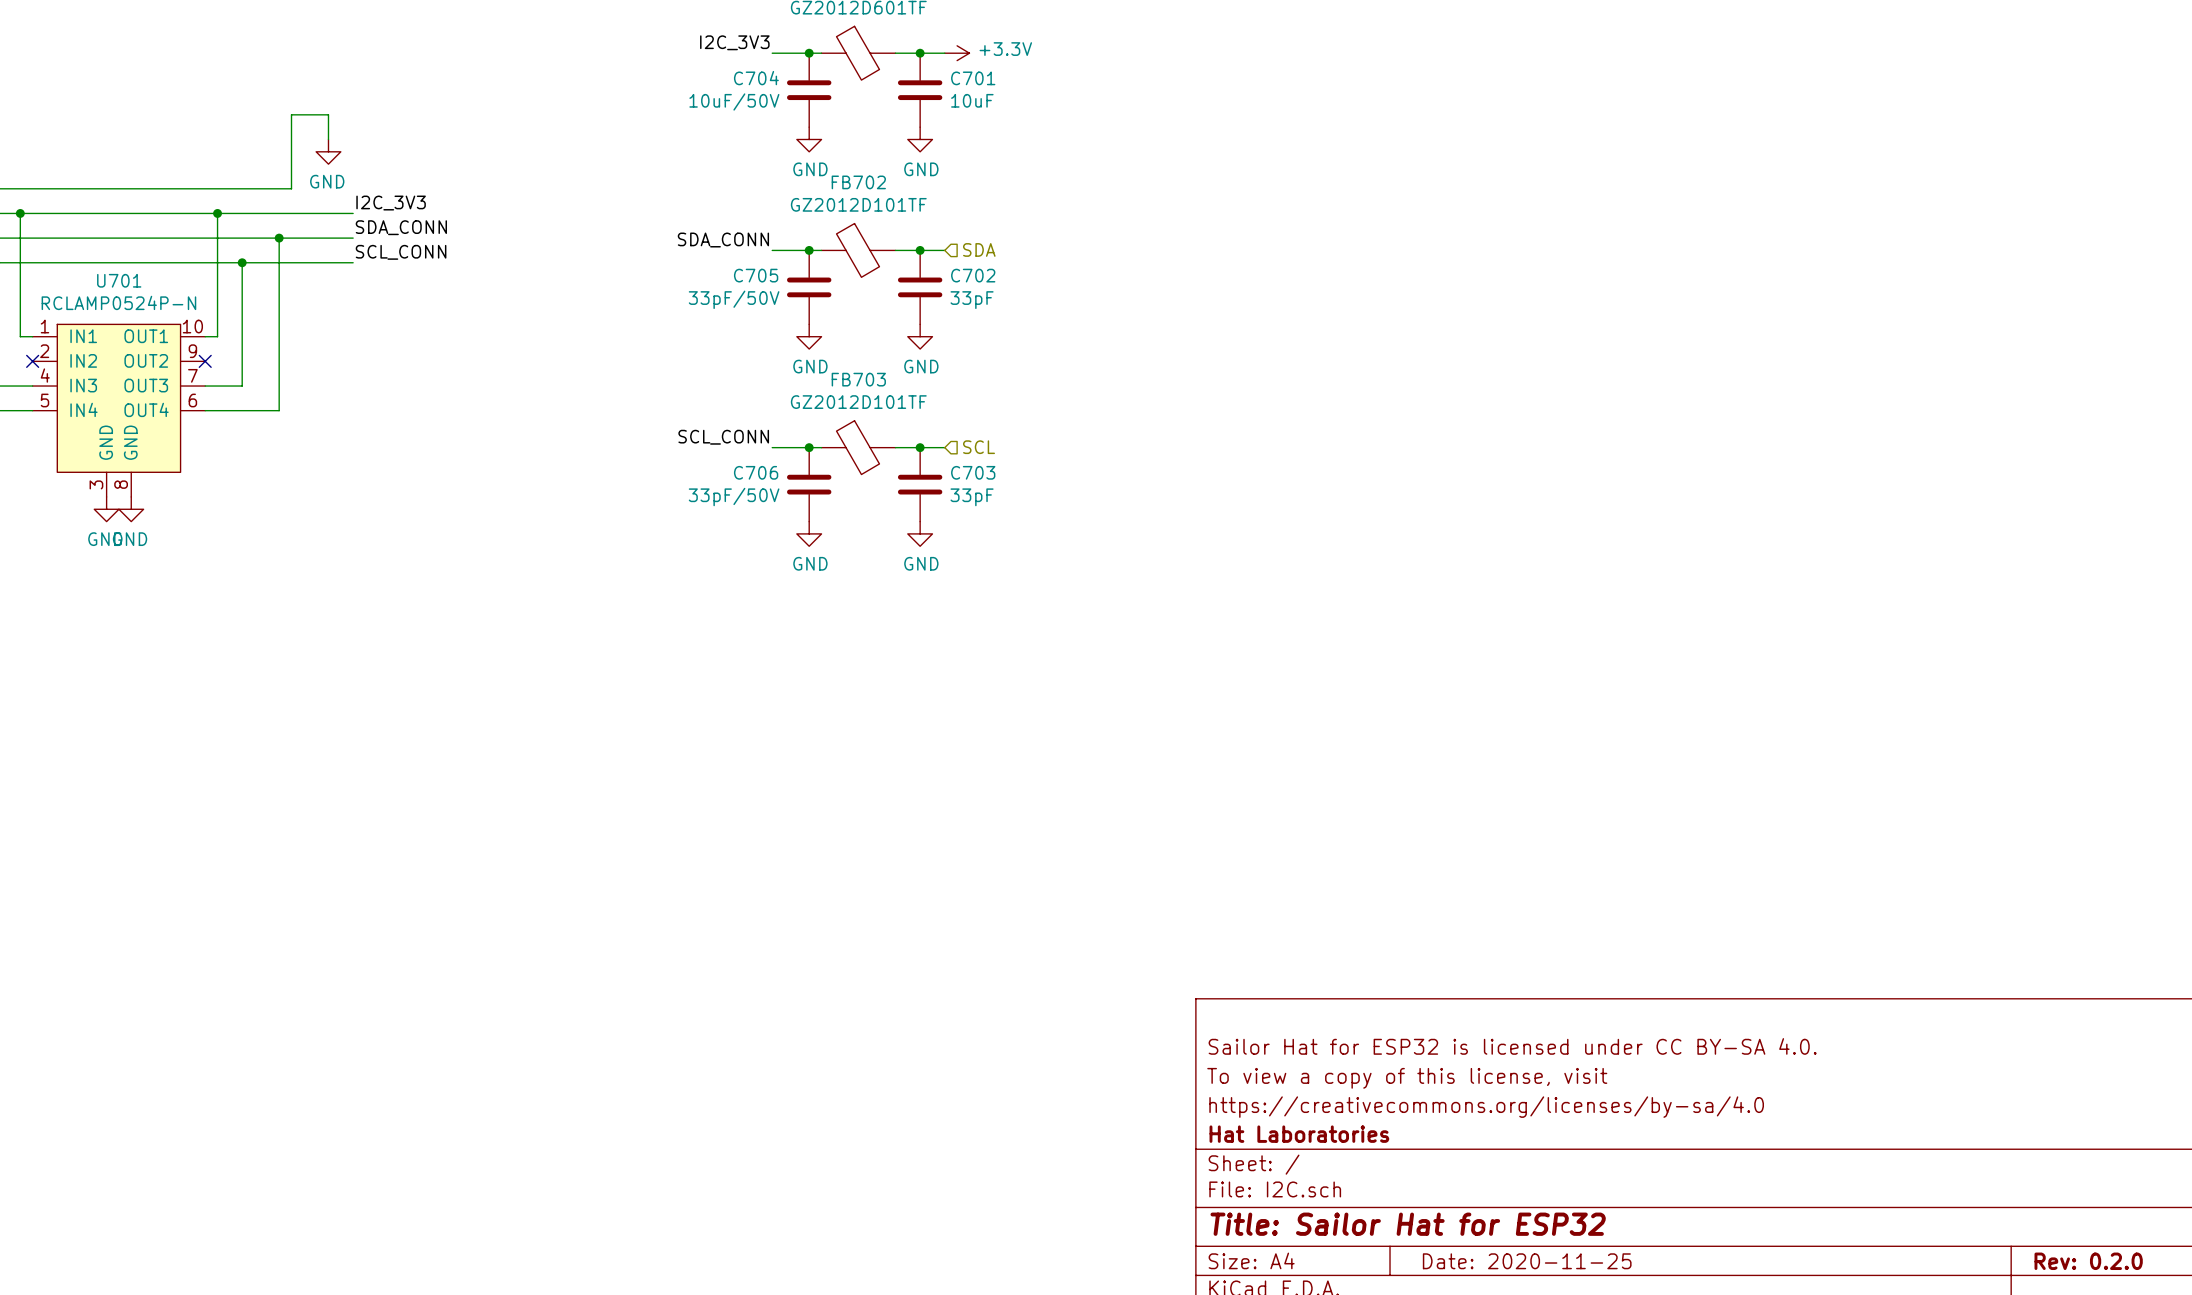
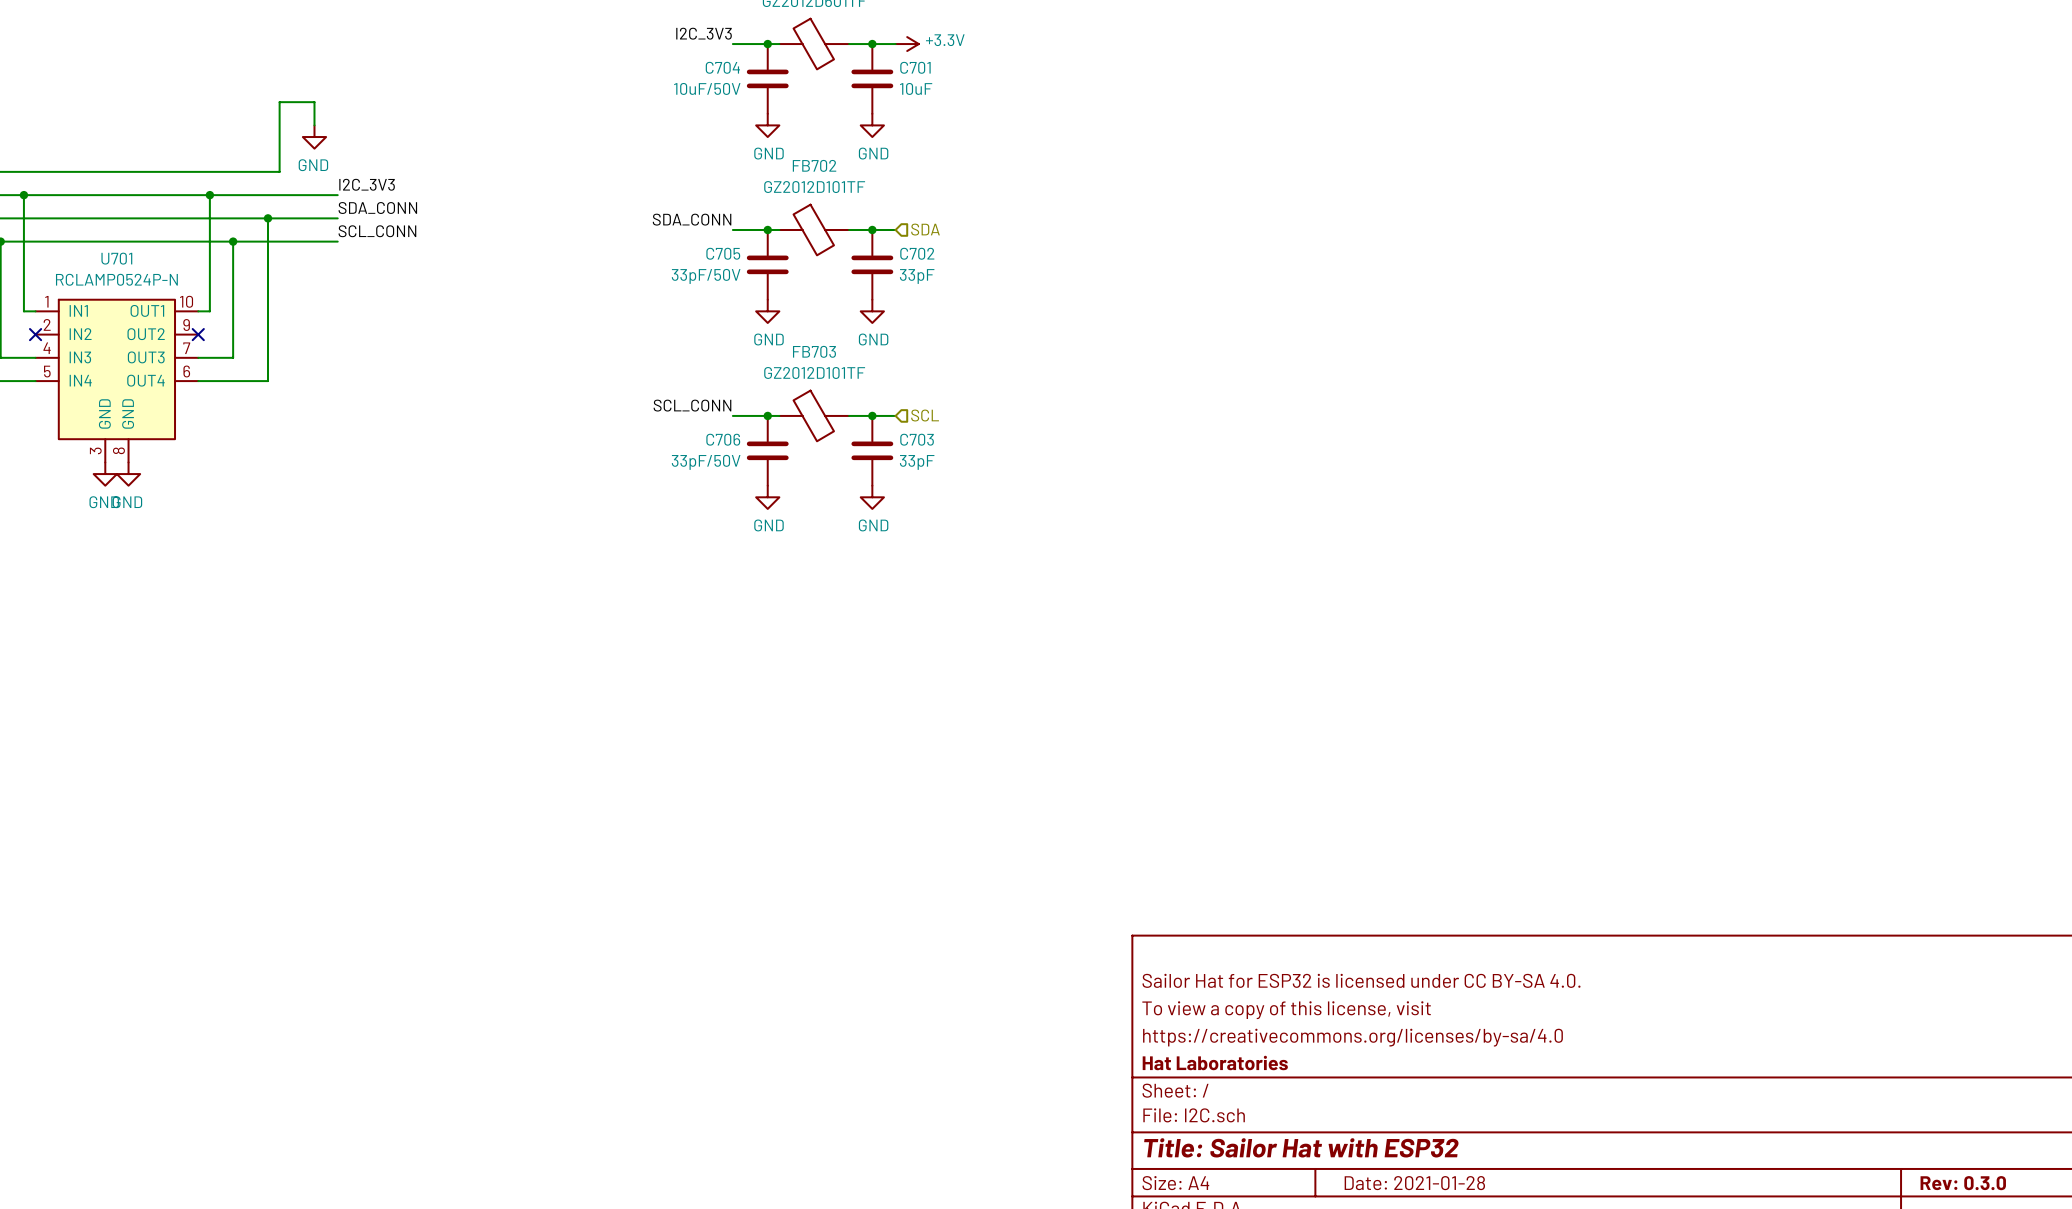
title block: Title: Sailor Hat for ESP32 (1408, 1224) -> Title: Sailor Hat with ESP32 (1301, 1147)
title block: Date: 2020-11-25 (1527, 1261) -> Date: 2021-01-28 (1414, 1183)
title block: Rev: 0.2.0 (2088, 1261) -> Rev: 0.3.0 (1963, 1183)

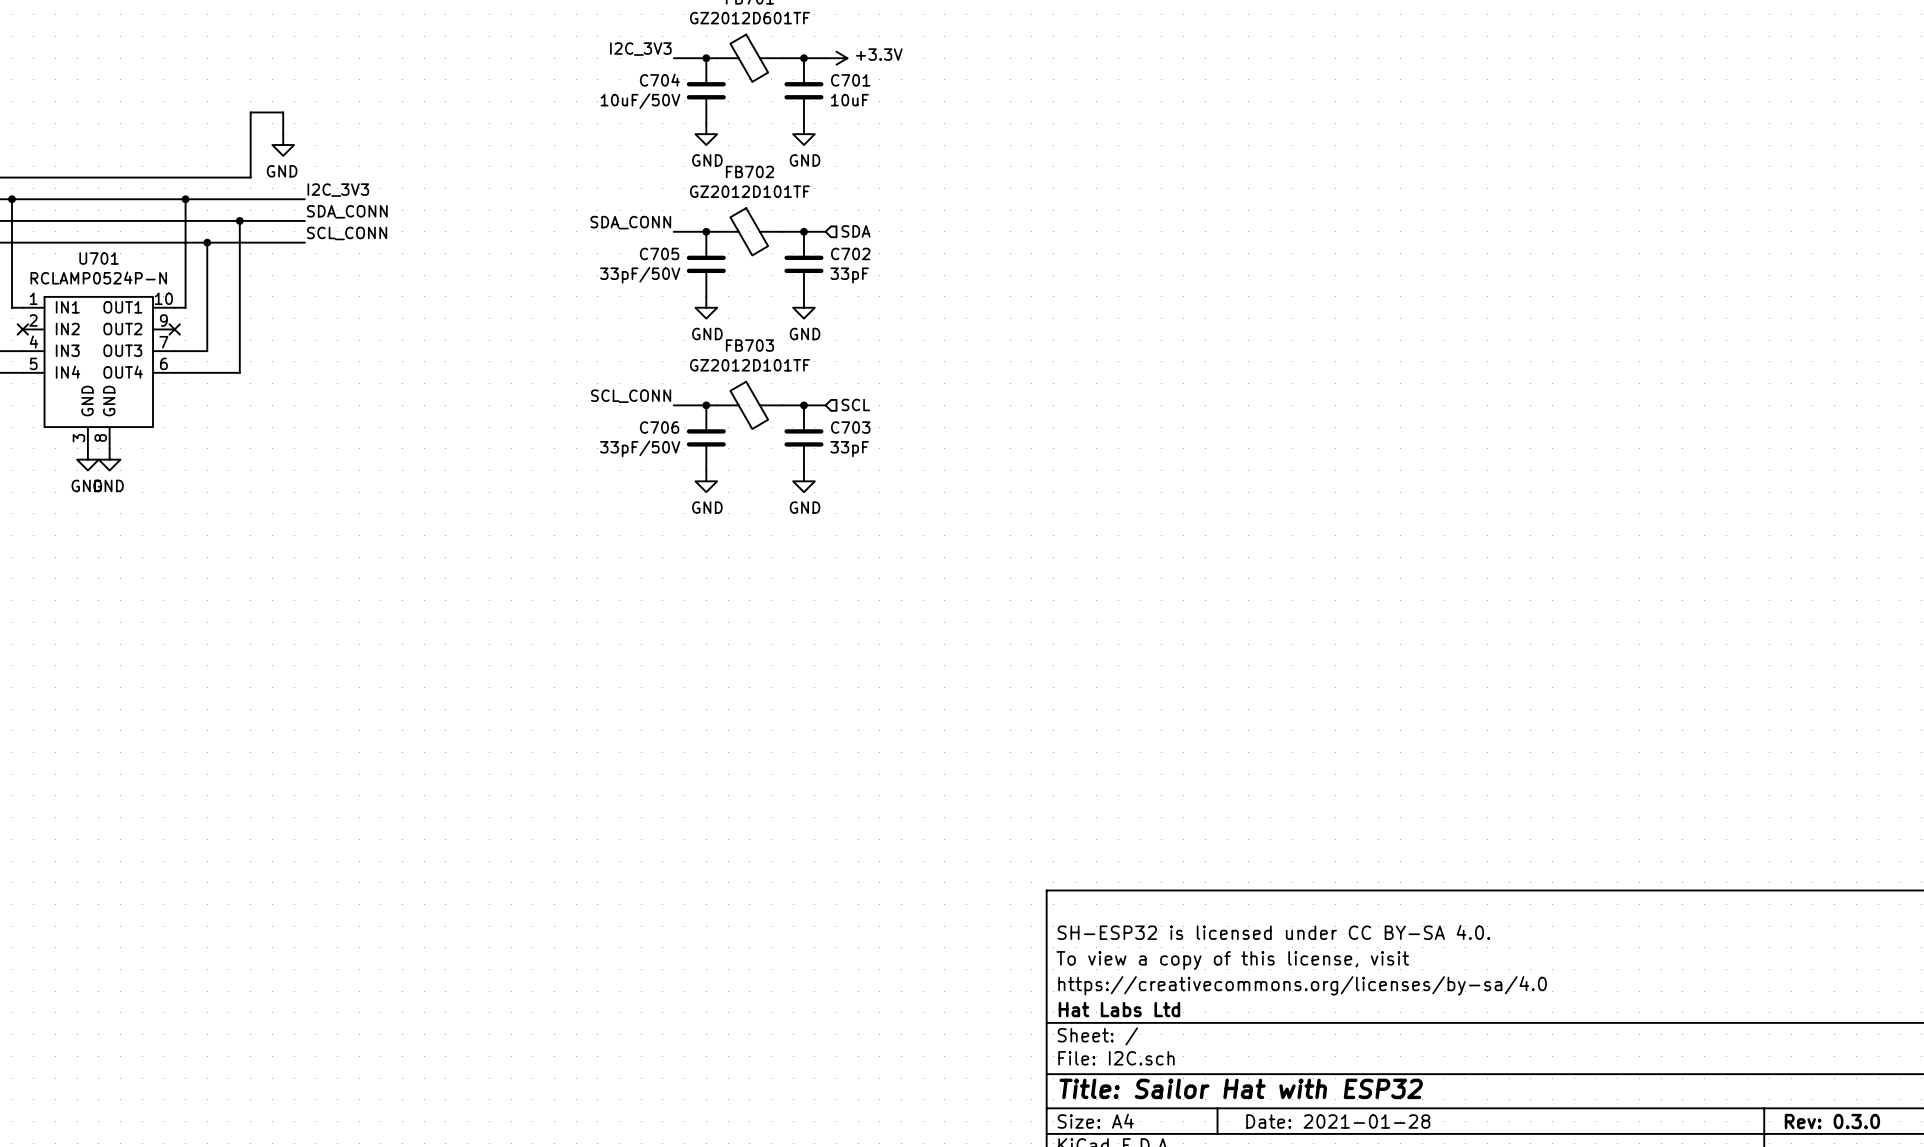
title block: Sailor Hat for ESP32 is licensed under CC BY-SA 4.0. (1361, 980) -> SH-ESP32 is licensed under CC BY-SA 4.0. (1273, 932)
title block: Hat Laboratories (1215, 1063) -> Hat Labs Ltd (1119, 1009)

